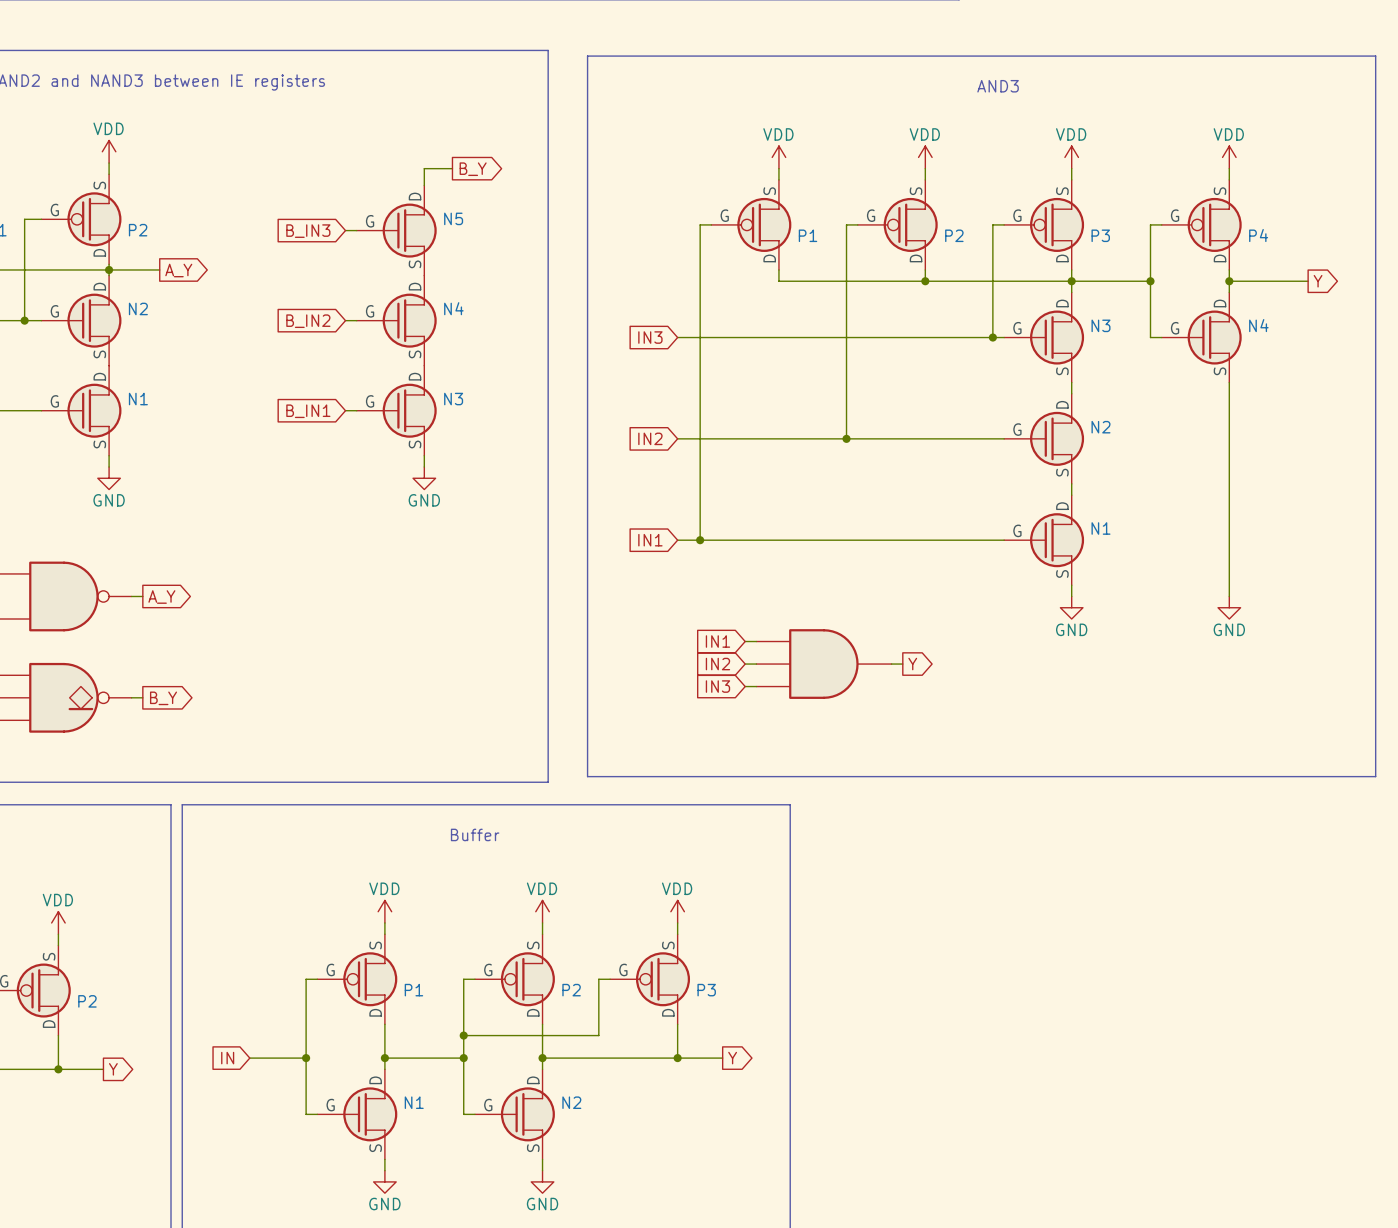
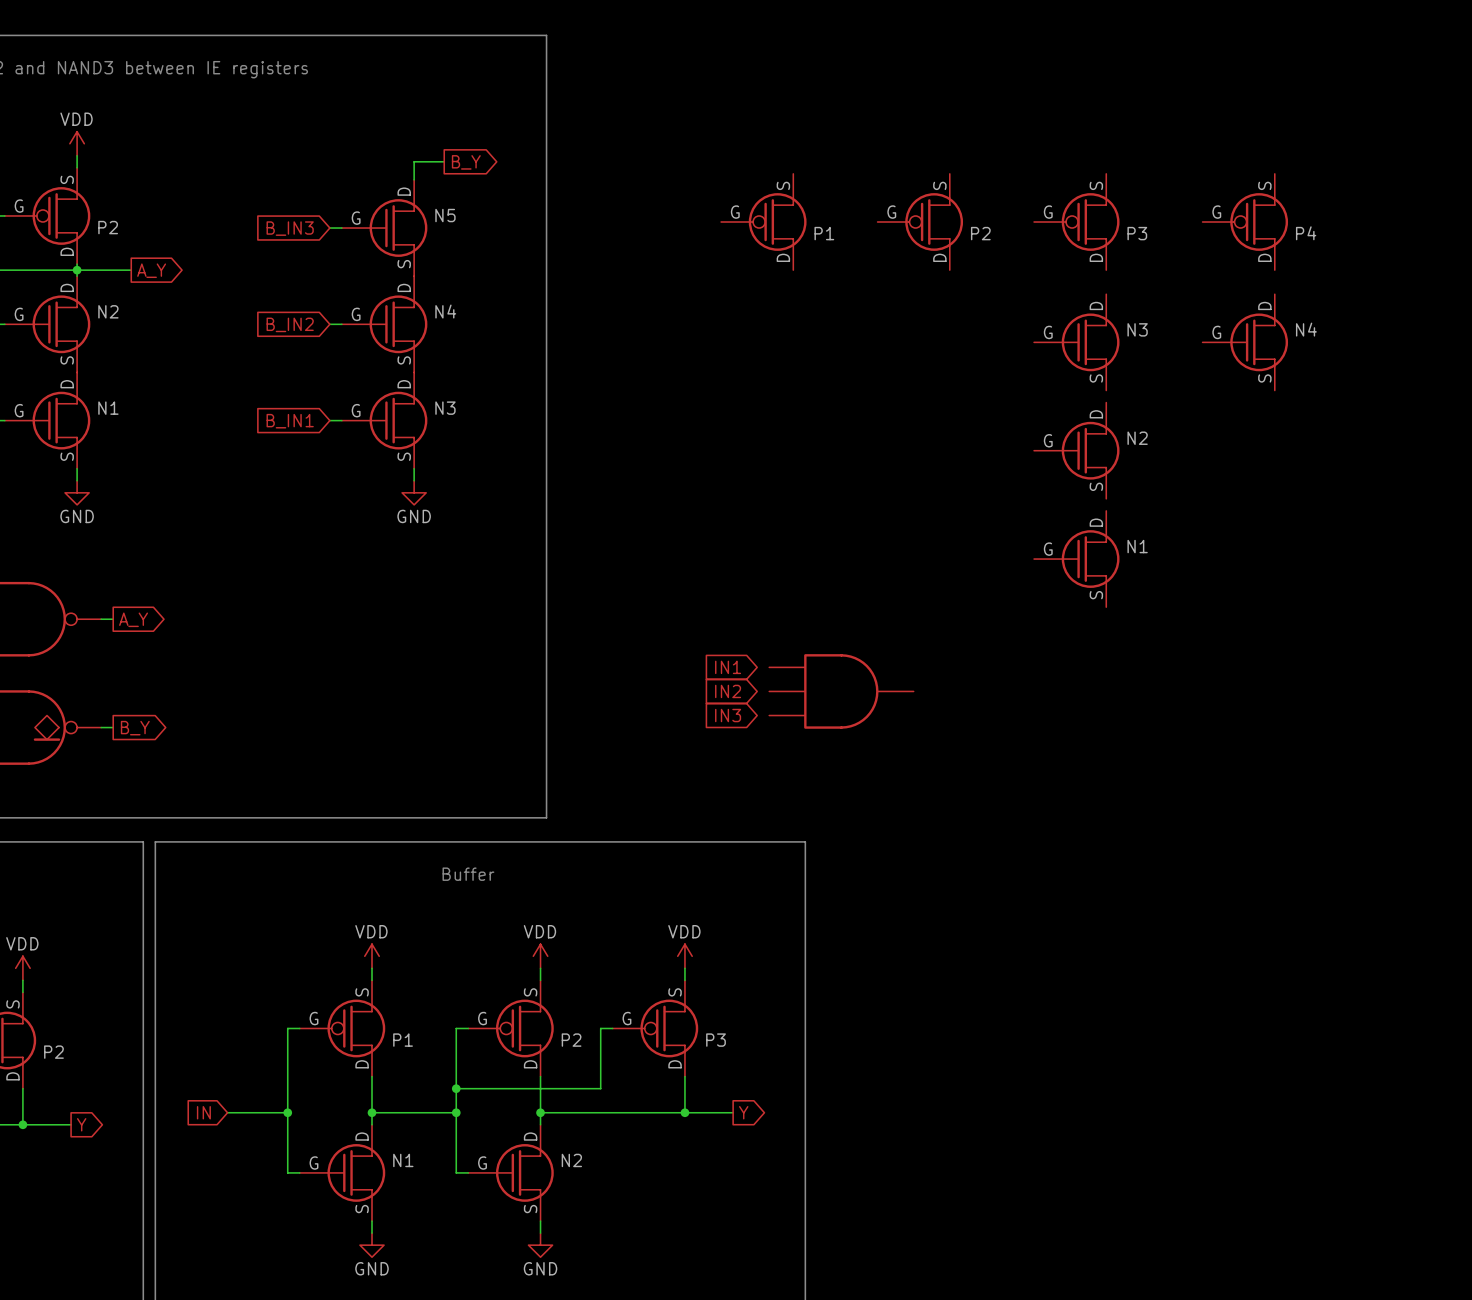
line: (587, 56) (1375, 56) (1375, 776) (587, 776) (587, 56) -> none
text: AND3 (998, 86) -> none
power symbol: VDD (778, 157) -> none
power symbol: VDD (925, 157) -> none
power symbol: VDD (1071, 157) -> none
power symbol: VDD (1229, 157) -> none
wire: (778, 168) (778, 179) -> none
wire: (925, 168) (925, 179) -> none
wire: (1071, 168) (1071, 179) -> none
wire: (1229, 168) (1229, 179) -> none
wire: (711, 224) (700, 224) (700, 540) -> none
wire: (857, 224) (846, 224) (846, 438) -> none
wire: (1004, 224) (992, 224) (992, 337) -> none
wire: (1161, 224) (1150, 224) (1150, 337) (1161, 337) -> none
wire: (778, 269) (778, 281) (1150, 281) -> none
wire: (925, 269) (925, 281) -> none
wire: (1071, 269) (1071, 292) -> none
wire: (1229, 269) (1229, 292) -> none
junction: (925, 281) -> none
junction: (1071, 281) -> none
junction: (1150, 281) -> none
wire: (1229, 281) (1308, 281) -> none
junction: (1229, 281) -> none
global label: Y (1318, 281) -> none
global label: IN3 (650, 337) -> none
wire: (677, 337) (1004, 337) -> none
junction: (992, 337) -> none
wire: (1071, 382) (1071, 393) -> none
wire: (1229, 382) (1229, 596) -> none
global label: IN2 (650, 438) -> none
wire: (677, 438) (1004, 438) -> none
junction: (846, 438) -> none
wire: (1071, 483) (1071, 495) -> none
global label: IN1 (650, 540) -> none
wire: (677, 540) (1004, 540) -> none
junction: (700, 540) -> none
wire: (1071, 585) (1071, 596) -> none
power symbol: GND (1071, 607) -> none
power symbol: GND (1229, 607) -> none
wire: (745, 641) (756, 641) -> none
wire: (745, 664) (756, 664) -> none
wire: (891, 664) (902, 664) -> none
global label: Y (912, 664) -> none
wire: (745, 686) (756, 686) -> none

